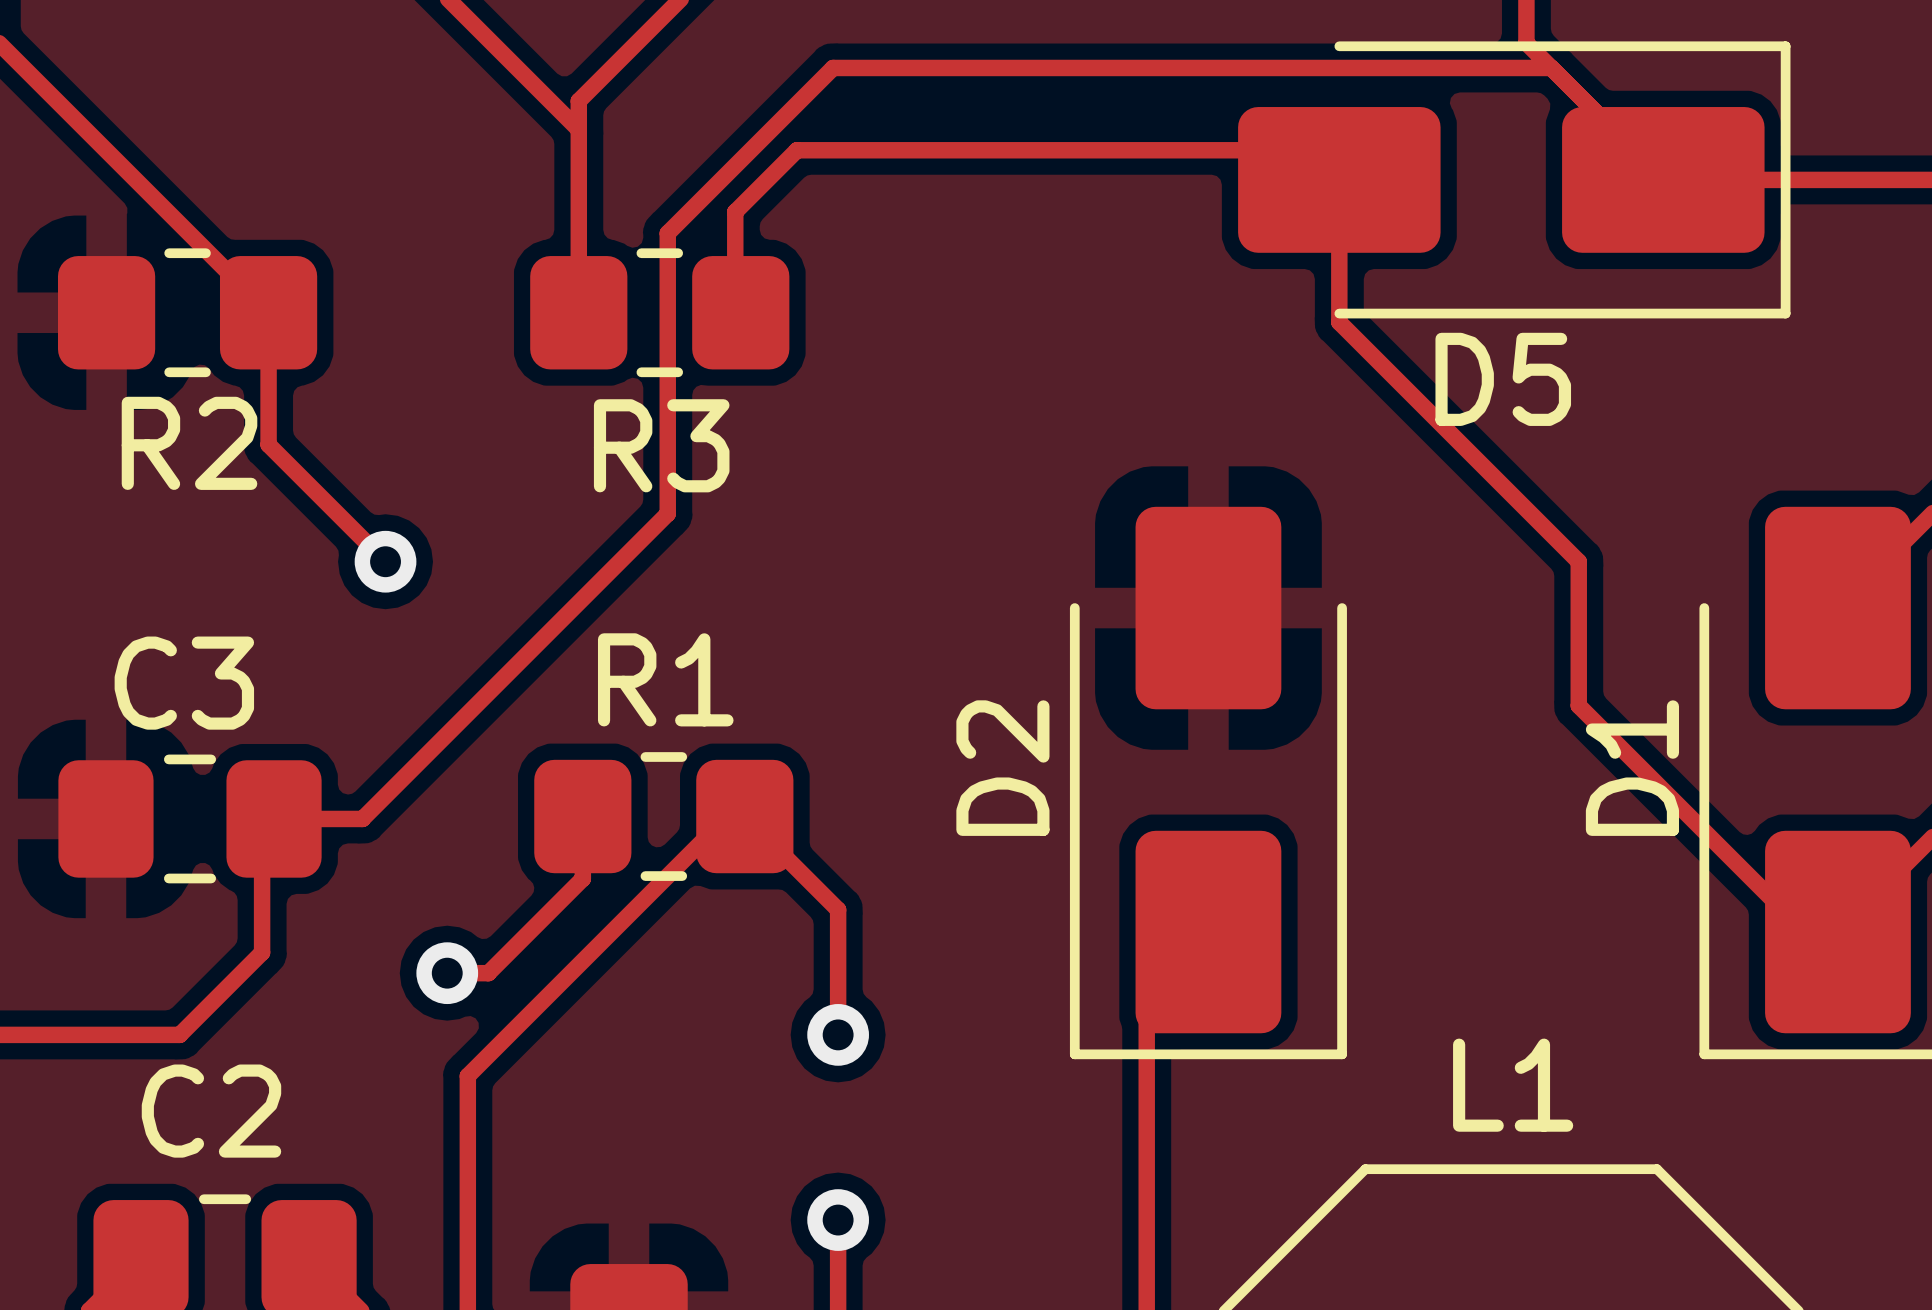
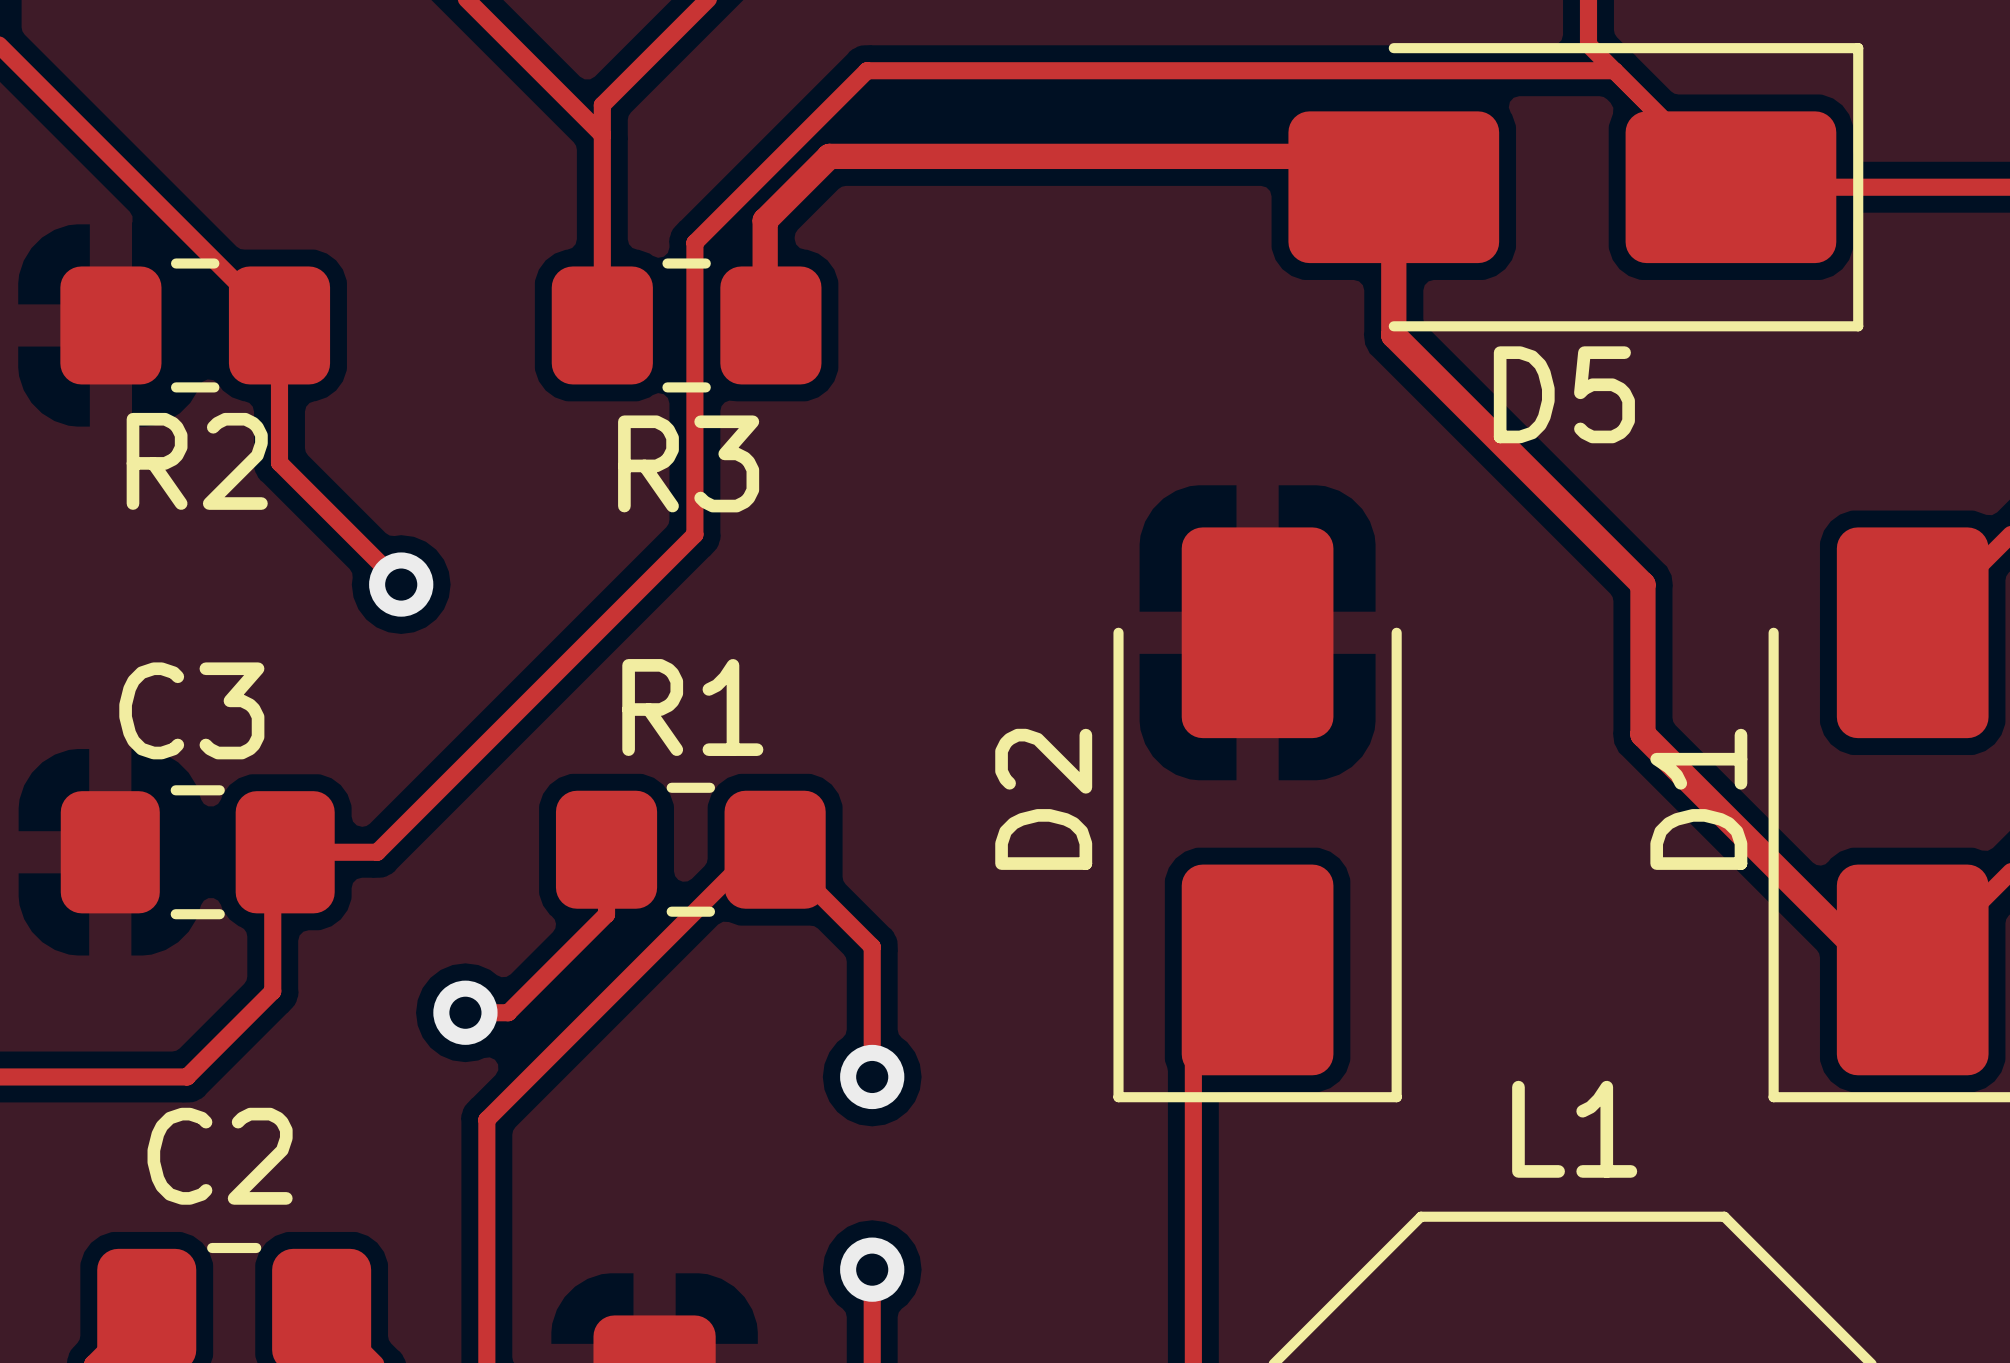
track width: thin (1309, 150) (796, 150) (735, 211) (735, 307) -> thick (1362, 156) (829, 156) (765, 220) (765, 319)
track width: thin (1339, 179) (1339, 322) (1578, 561) (1578, 705) (1805, 932) -> thick (1393, 187) (1393, 335) (1642, 584) (1642, 734) (1878, 969)

